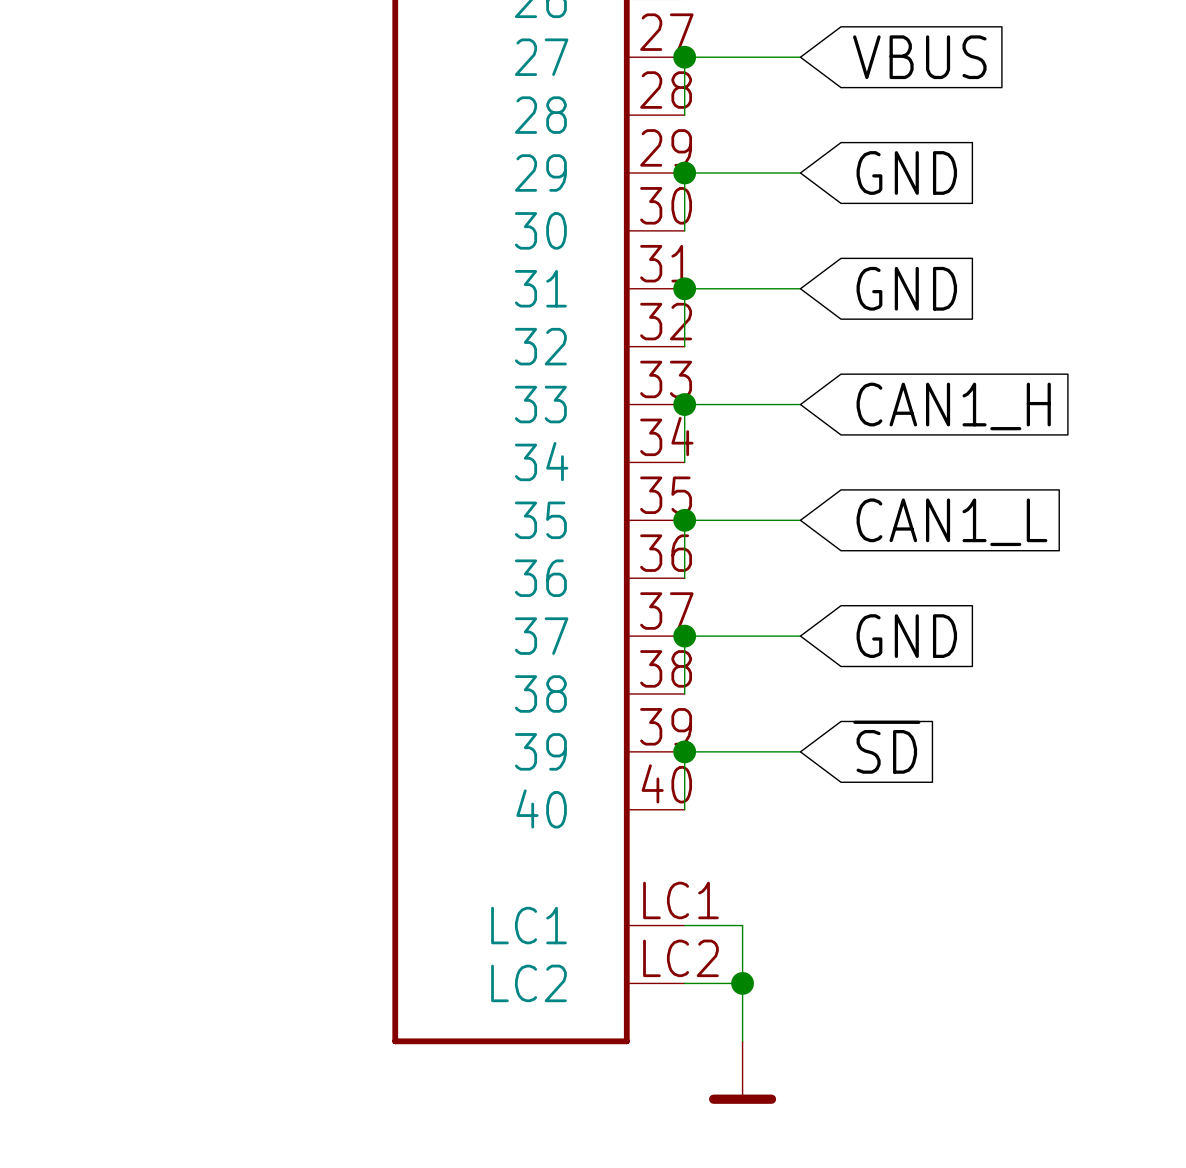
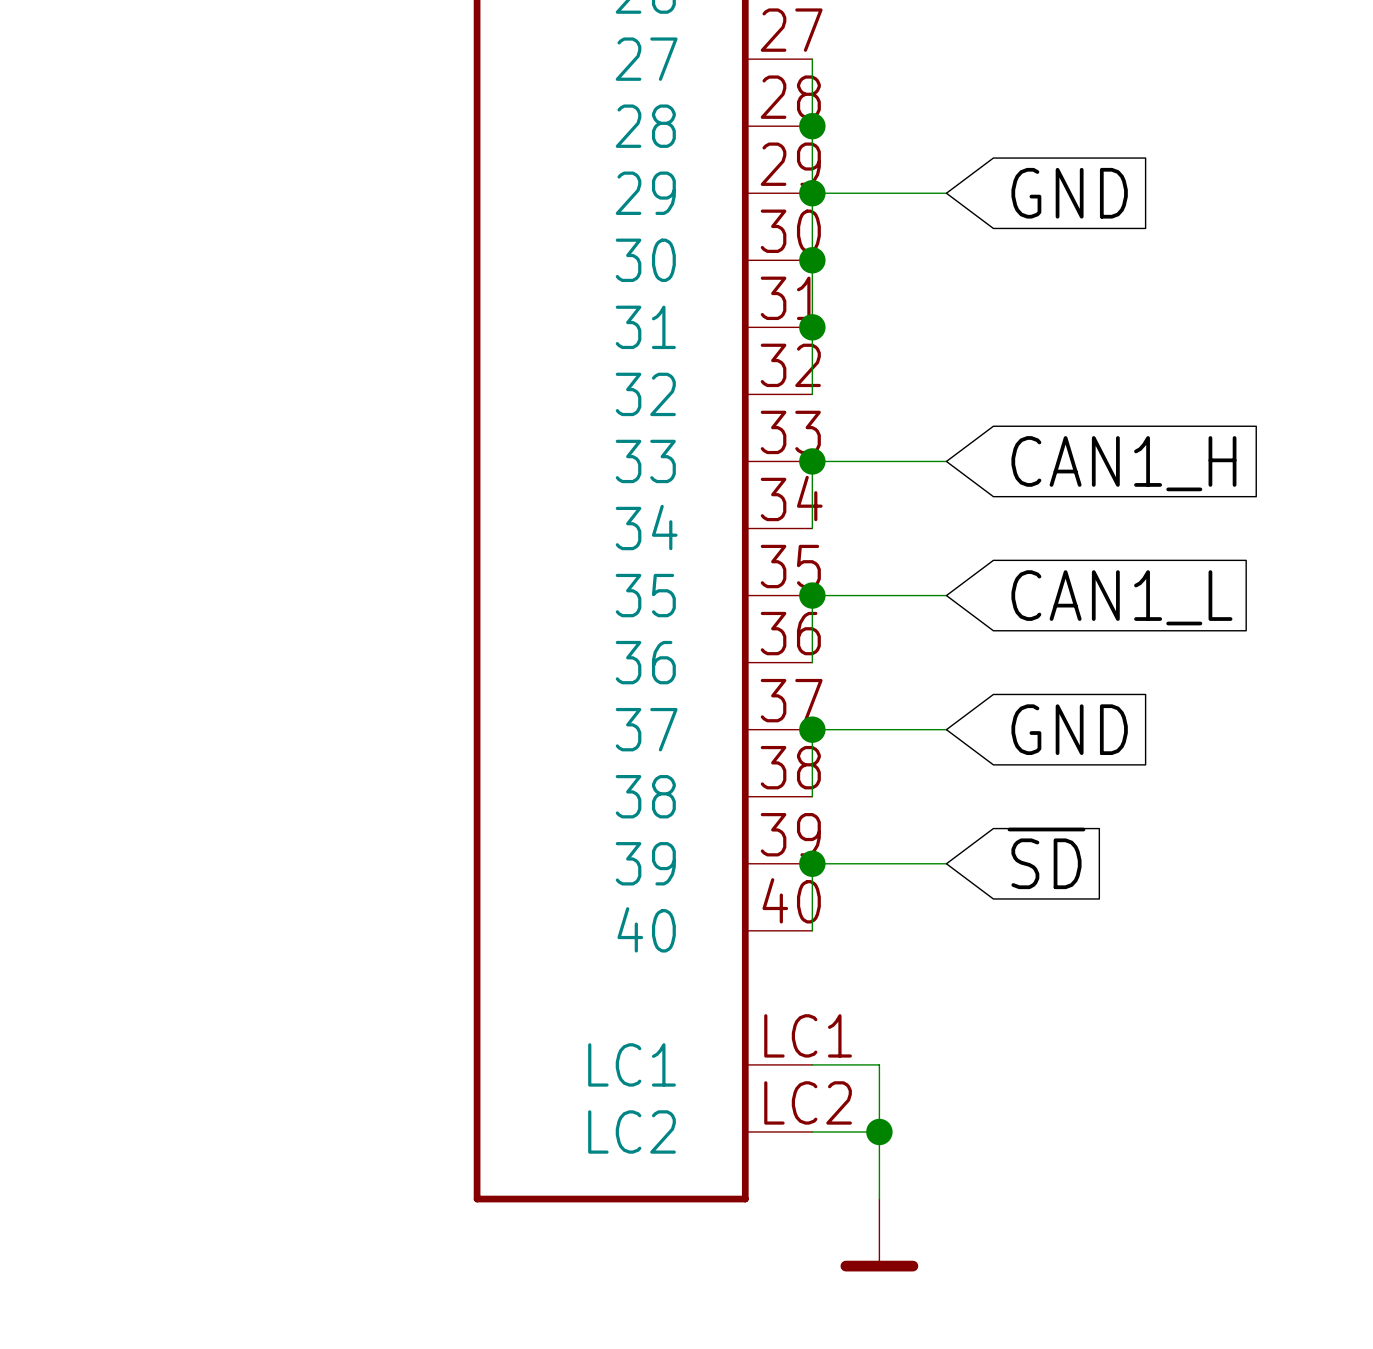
wire: (684, 57) (800, 57) -> none
junction position: (684, 57) -> (812, 126)
global label: VBUS (919, 57) -> none
wire: none -> (812, 126) (812, 193)
junction: none -> (812, 260)
wire: (684, 288) (800, 288) -> (812, 327) (812, 260)
global label: GND (906, 288) -> none

